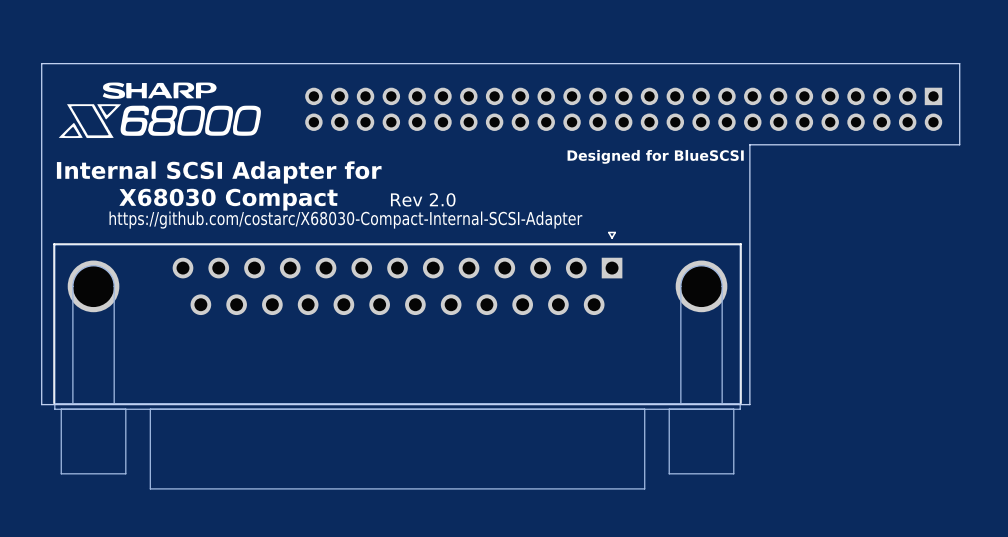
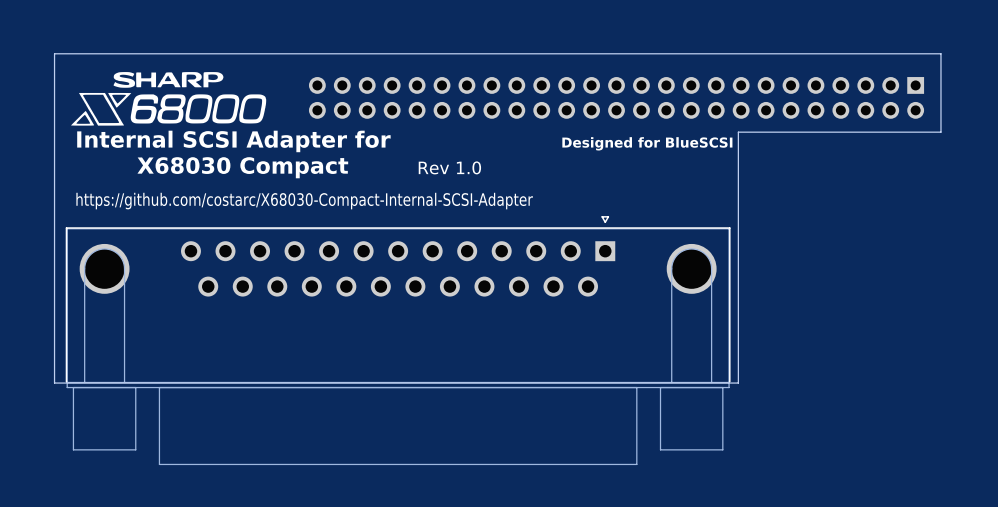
text position: Internal SCSI Adapter for (219, 172) -> Internal SCSI Adapter for (233, 141)
text position: X68030 Compact (228, 199) -> X68030 Compact (242, 167)
text: Rev 2.0 (423, 199) -> Rev 1.0 (449, 167)
text position: https://github.com/costarc/X68030-Compact-Internal-SCSI-Adapter (345, 220) -> https://github.com/costarc/X68030-Compact-Internal-SCSI-Adapter (304, 201)

